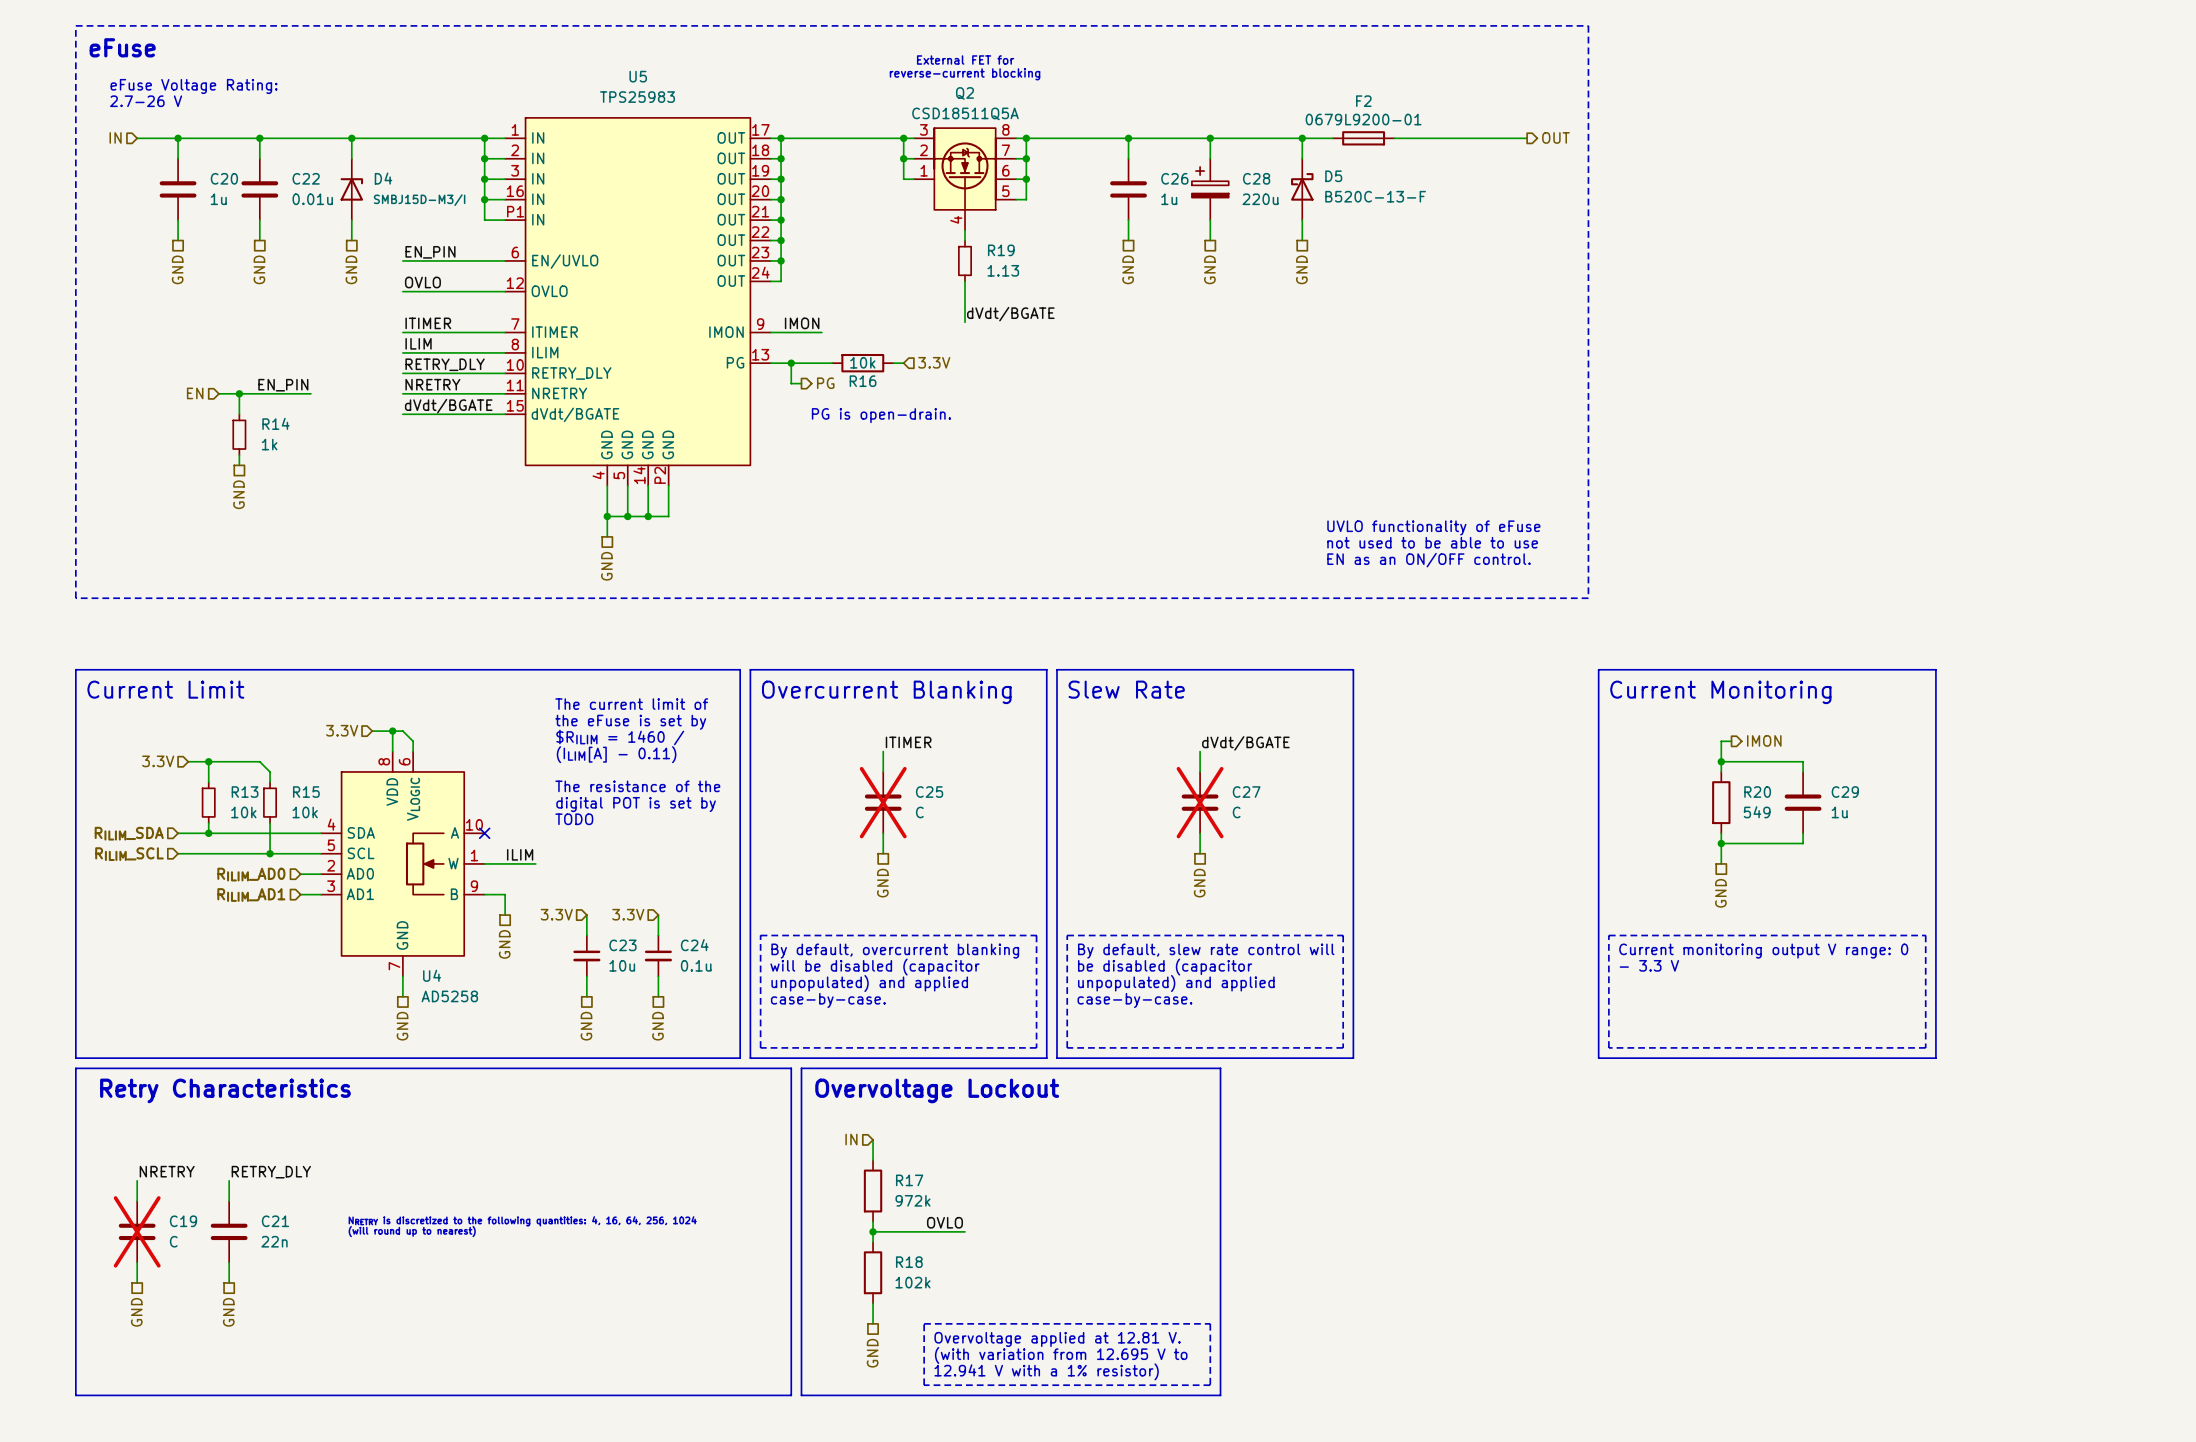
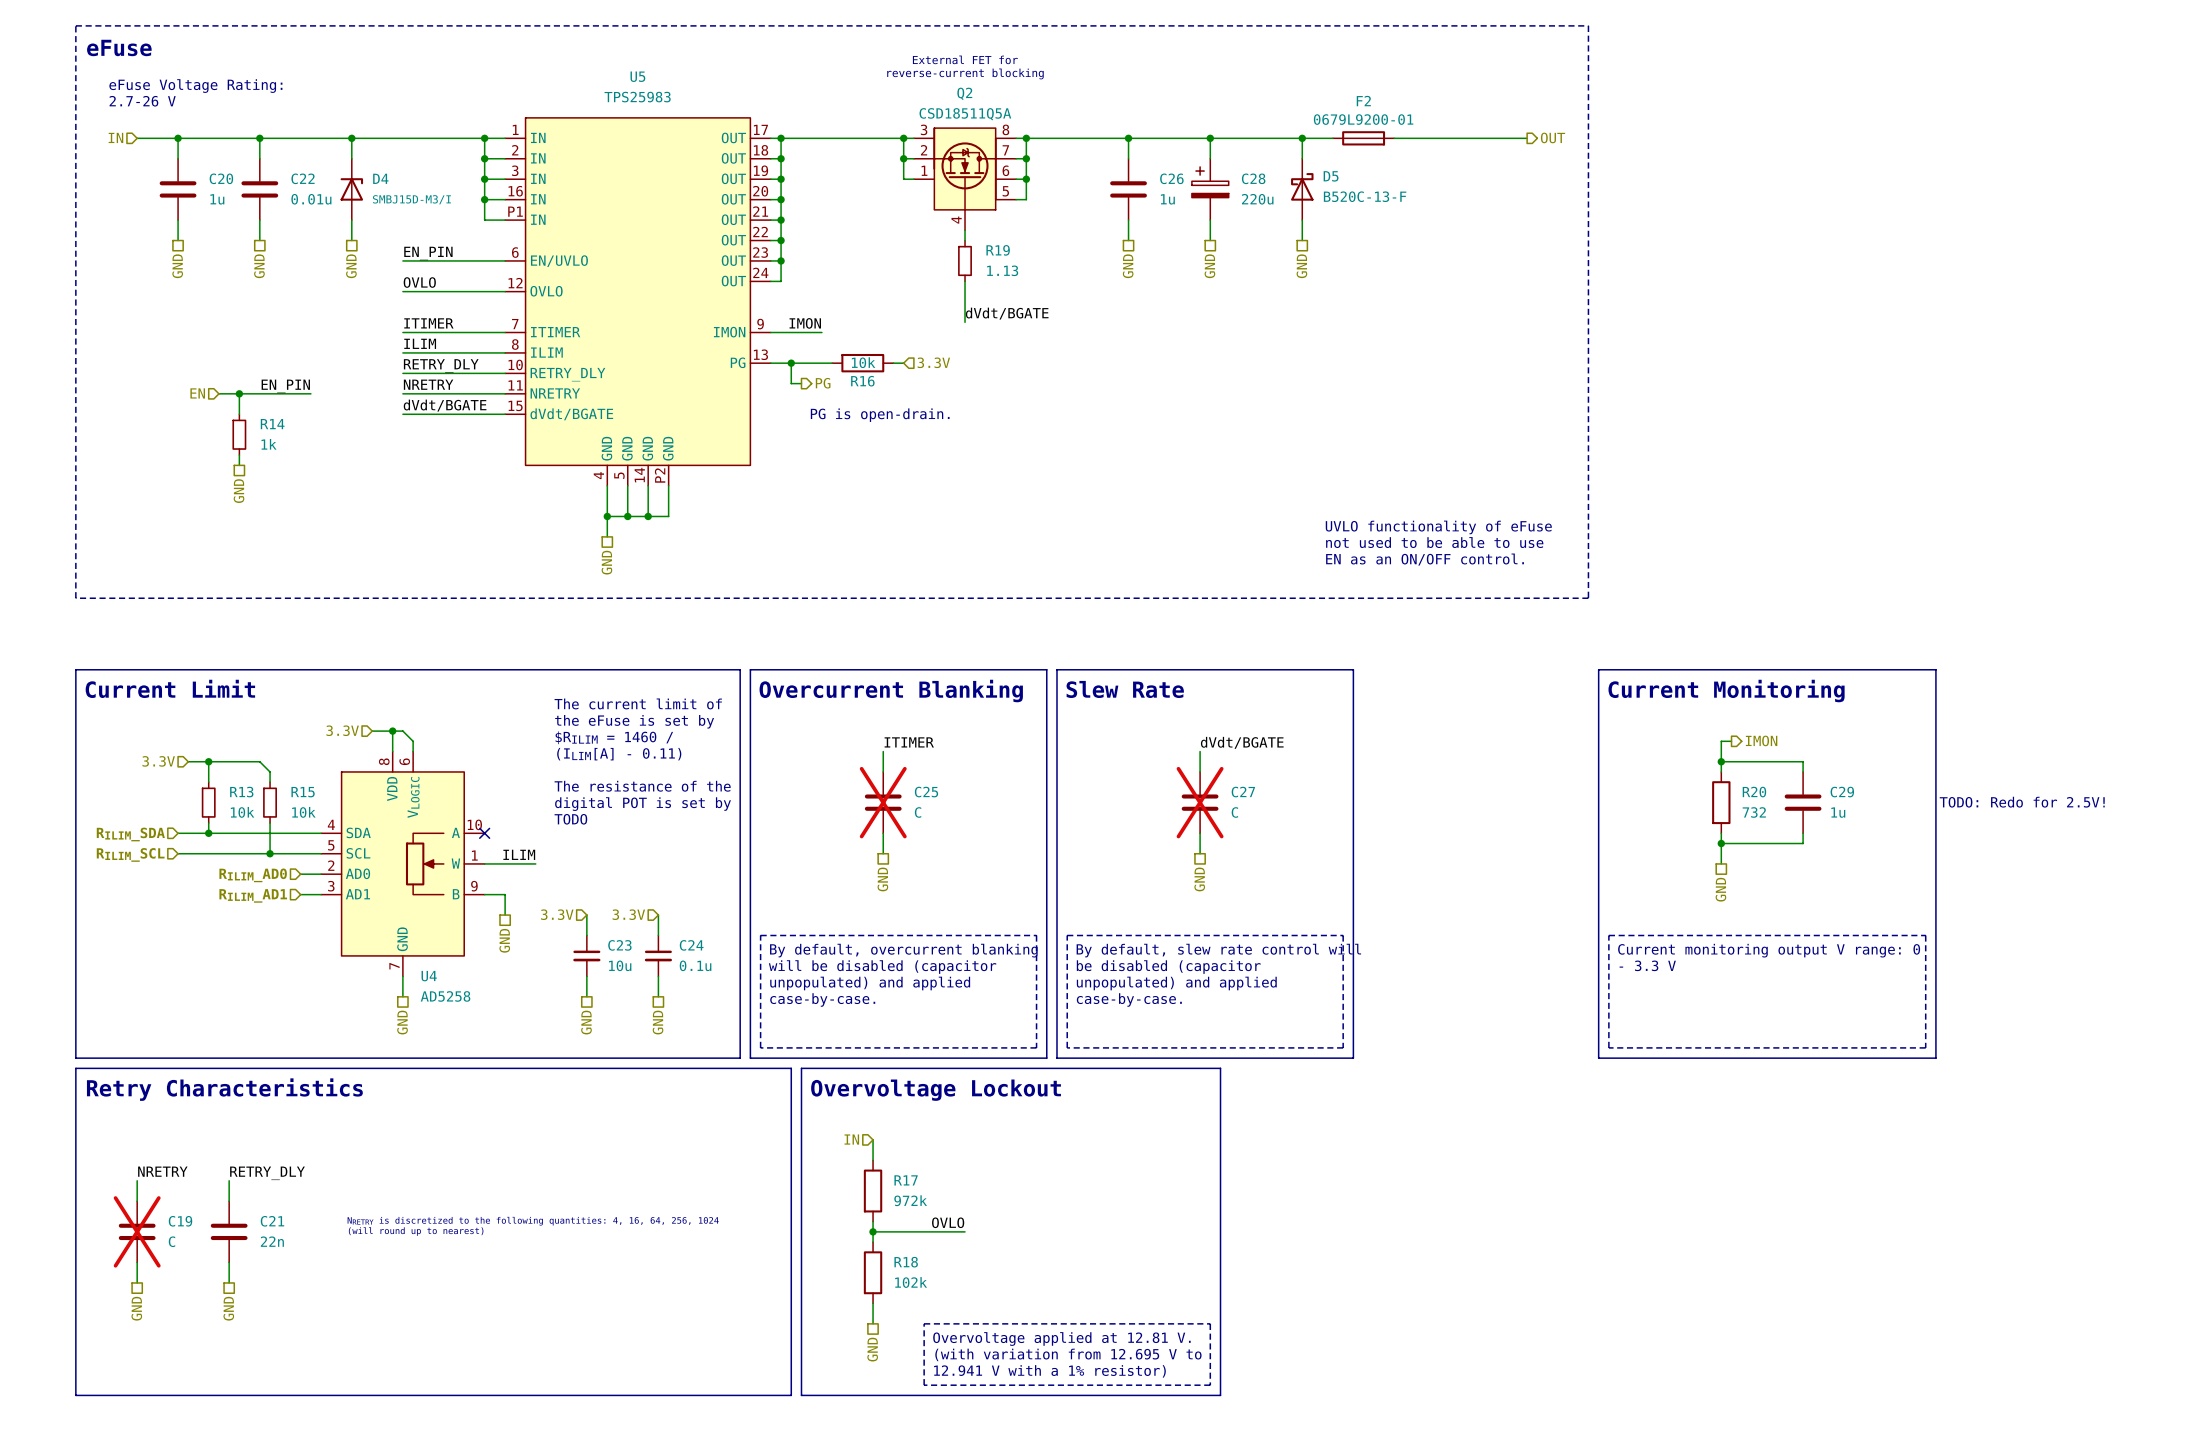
text: none -> TODO: Redo for 2.5V! (2022, 802)
R20 value: 549 (1757, 812) -> 732 (1754, 812)

